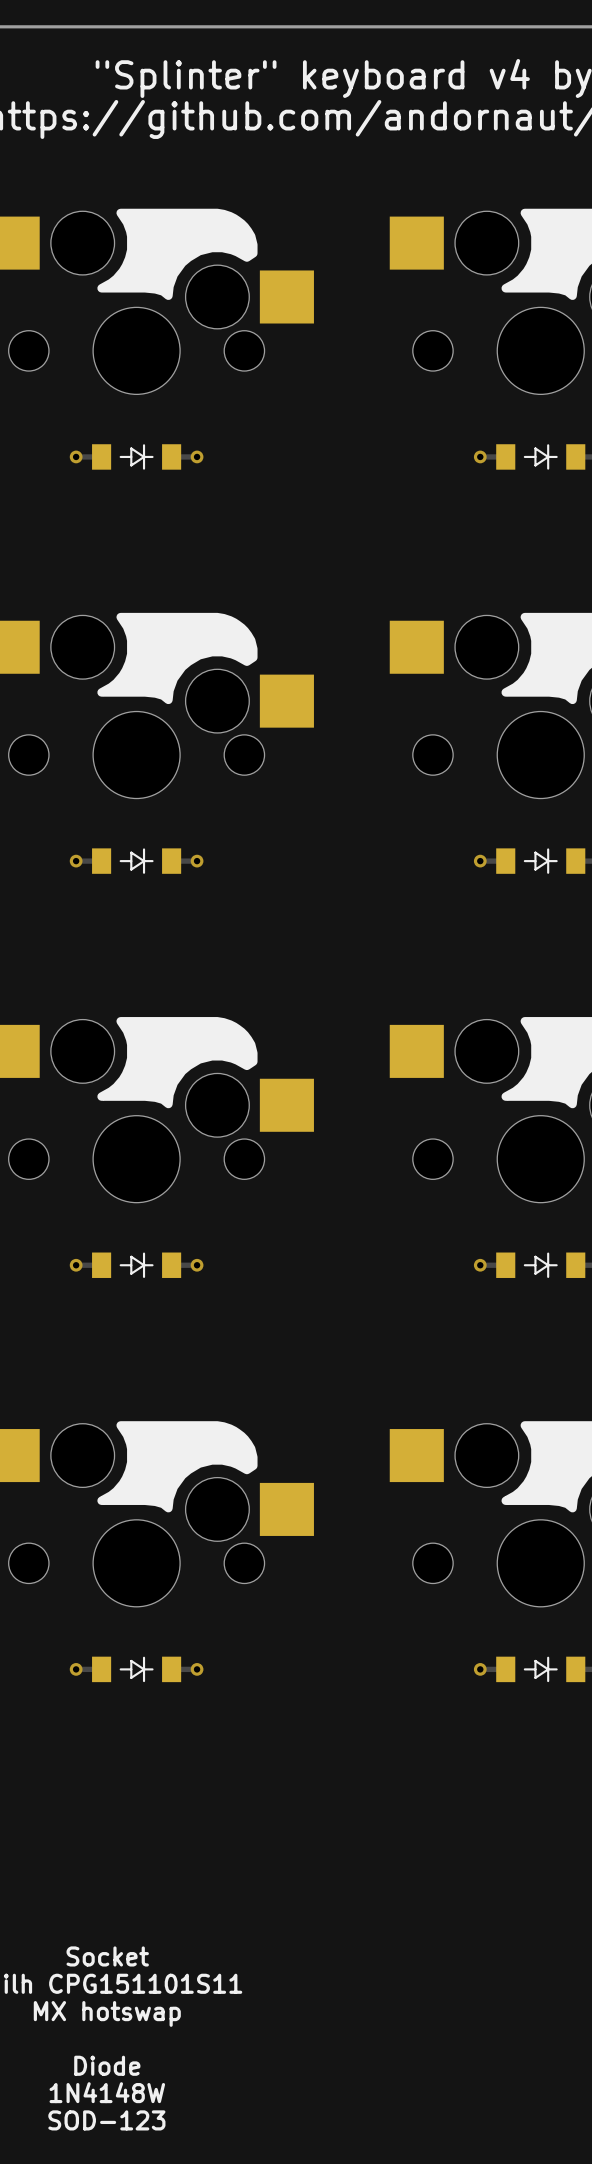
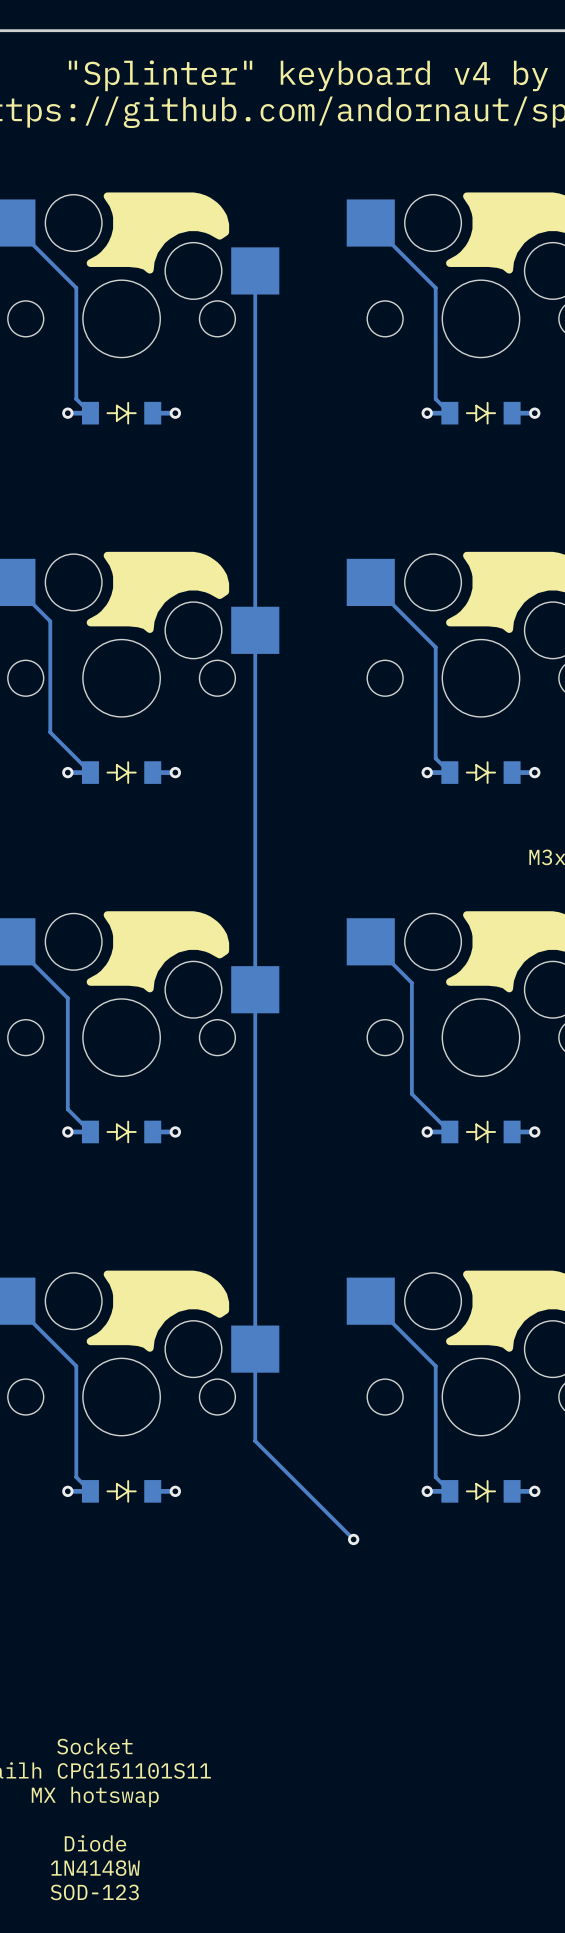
track: none -> (11, 223) (76, 287) (76, 399) (90, 413)
track: none -> (370, 223) (435, 287) (435, 399) (449, 413)
track: none -> (255, 270) (255, 1441) (353, 1539)
track: none -> (11, 582) (50, 621) (50, 732) (90, 772)
track: none -> (370, 582) (435, 647) (435, 758) (449, 772)
track: none -> (11, 941) (67, 998) (67, 1109) (90, 1131)
track: none -> (370, 941) (411, 982) (411, 1094) (449, 1131)
track: none -> (11, 1301) (76, 1366) (76, 1477) (90, 1491)
track: none -> (370, 1301) (435, 1366) (435, 1477) (449, 1491)
via: none -> (353, 1539)

